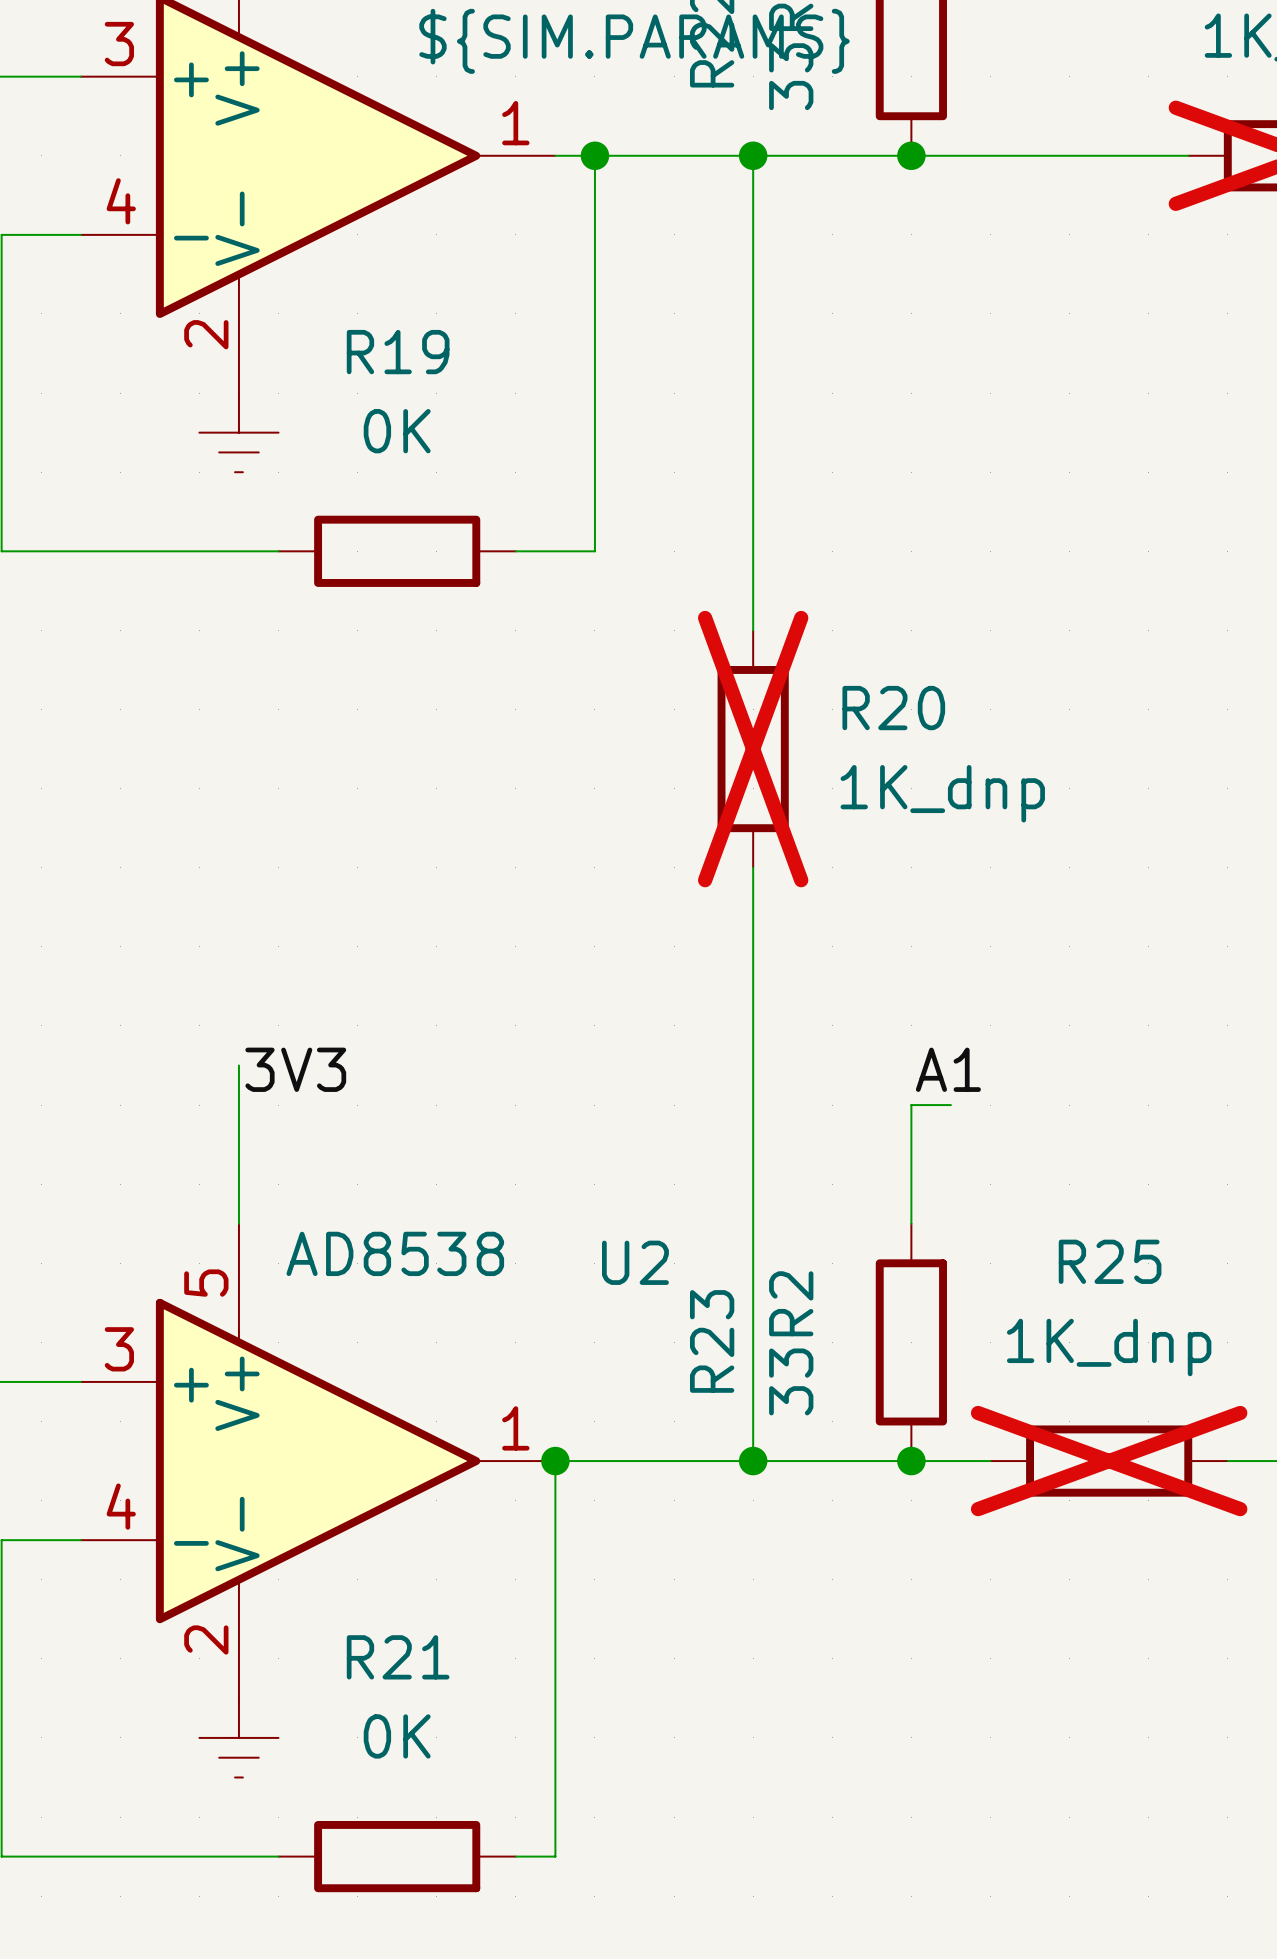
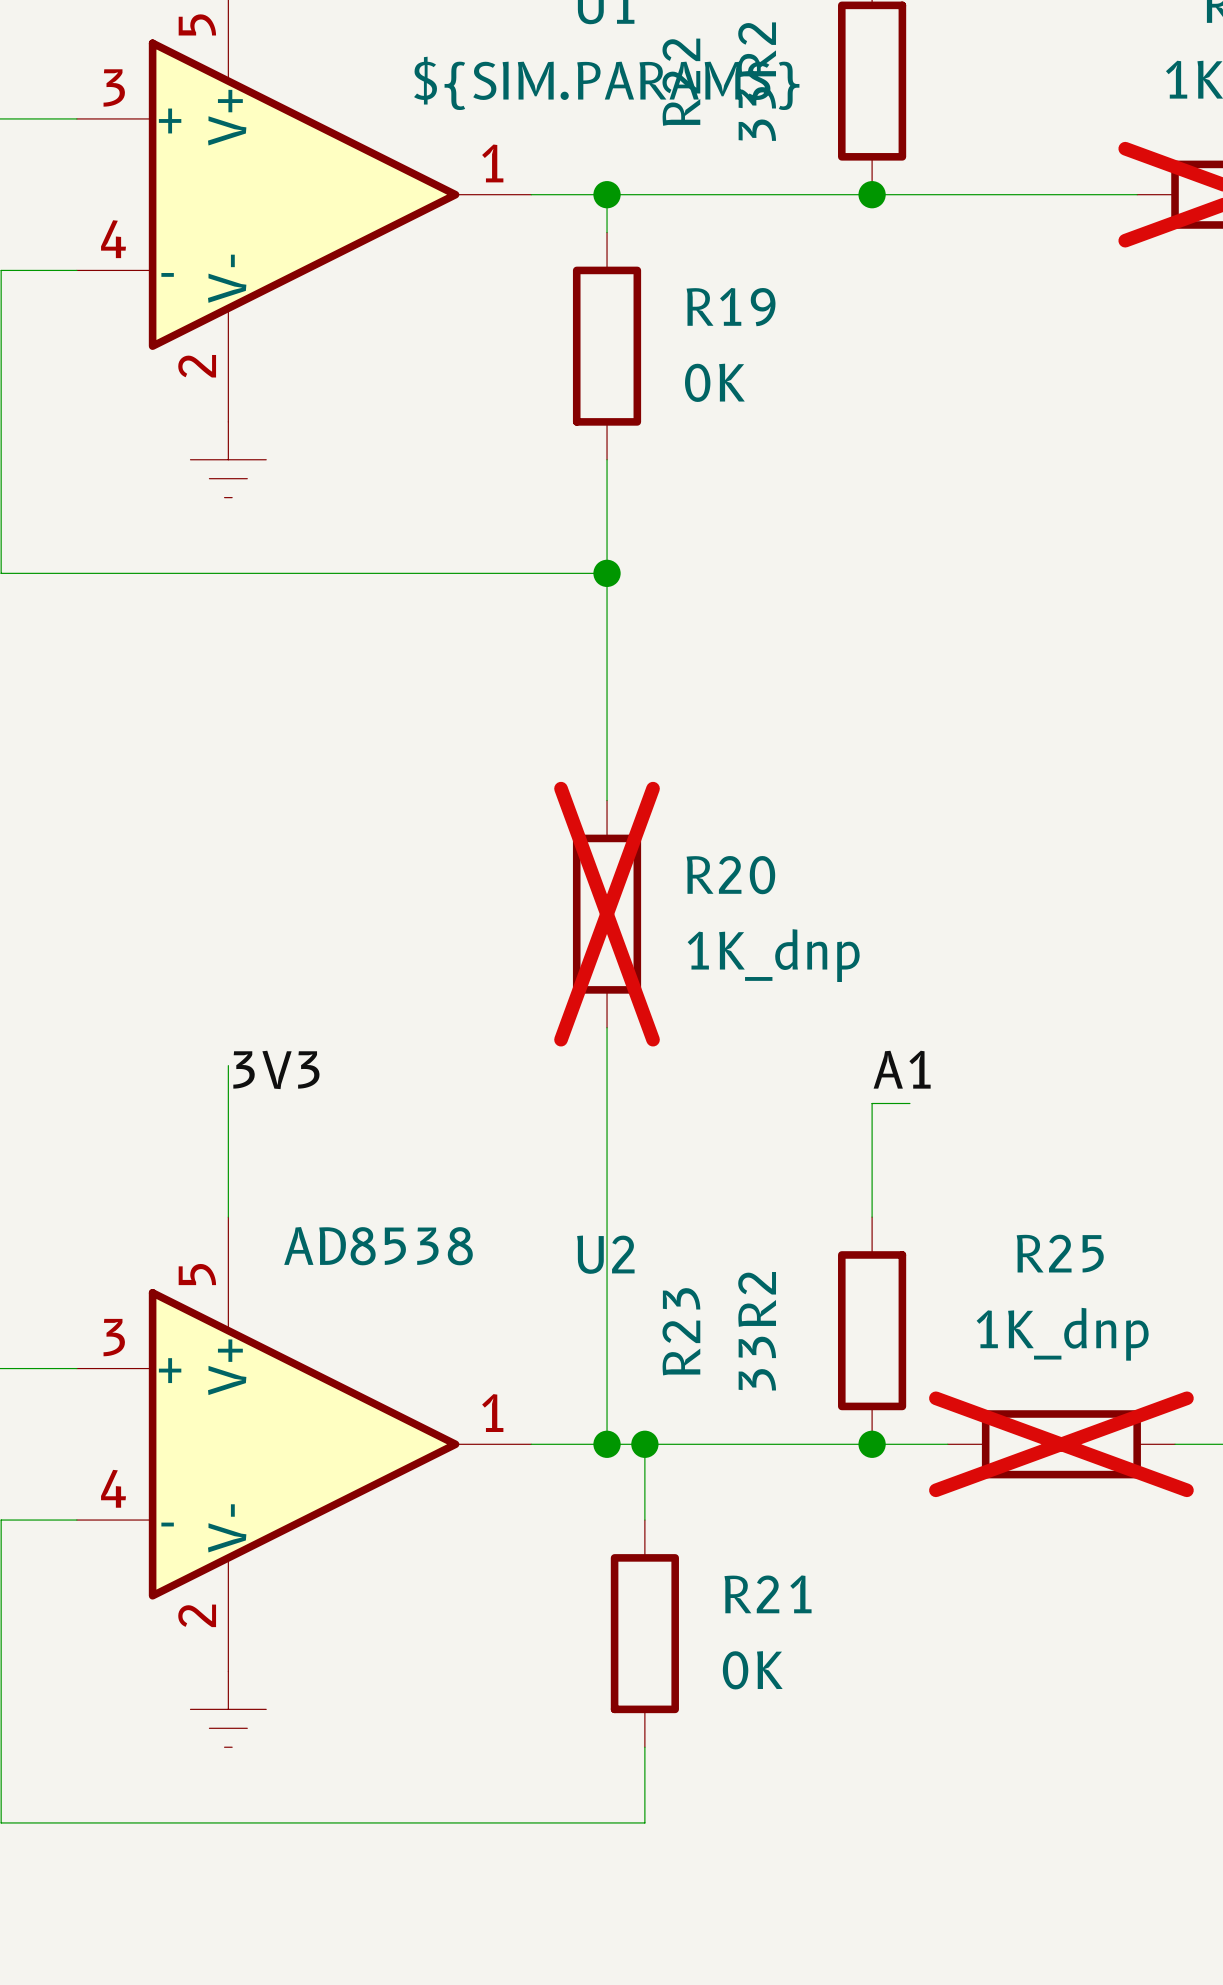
wire: (594, 155) (594, 551) -> (607, 573) (569, 573)
junction position: (594, 155) -> (607, 194)
wire: none -> (607, 194) (607, 232)
wire: (753, 155) (753, 630) -> none
junction: (753, 155) -> none
R19 name position: R19 (398, 352) -> R19 (731, 307)
wire: none -> (607, 459) (607, 800)
wire: none -> (266, 573) (493, 573)
R19 rotation: 0° (397, 551) -> 90° clockwise (607, 346)
R19 position: (397, 551) -> (607, 346)
junction: none -> (607, 573)
R20 position: (753, 749) -> (607, 914)
wire: (753, 867) (753, 1461) -> none
wire: none -> (607, 1027) (607, 1444)
wire: (555, 1461) (555, 1856) -> (644, 1747) (644, 1822) (531, 1822)
junction: (555, 1461) -> none
junction: none -> (607, 1444)
wire: none -> (644, 1444) (644, 1520)
junction: none -> (644, 1444)
junction: (753, 1461) -> none
R21 name position: R21 (398, 1657) -> R21 (768, 1594)
wire: none -> (266, 1822) (493, 1822)
R21 rotation: 0° (397, 1856) -> 90° clockwise (644, 1633)
R21 position: (397, 1856) -> (644, 1633)

